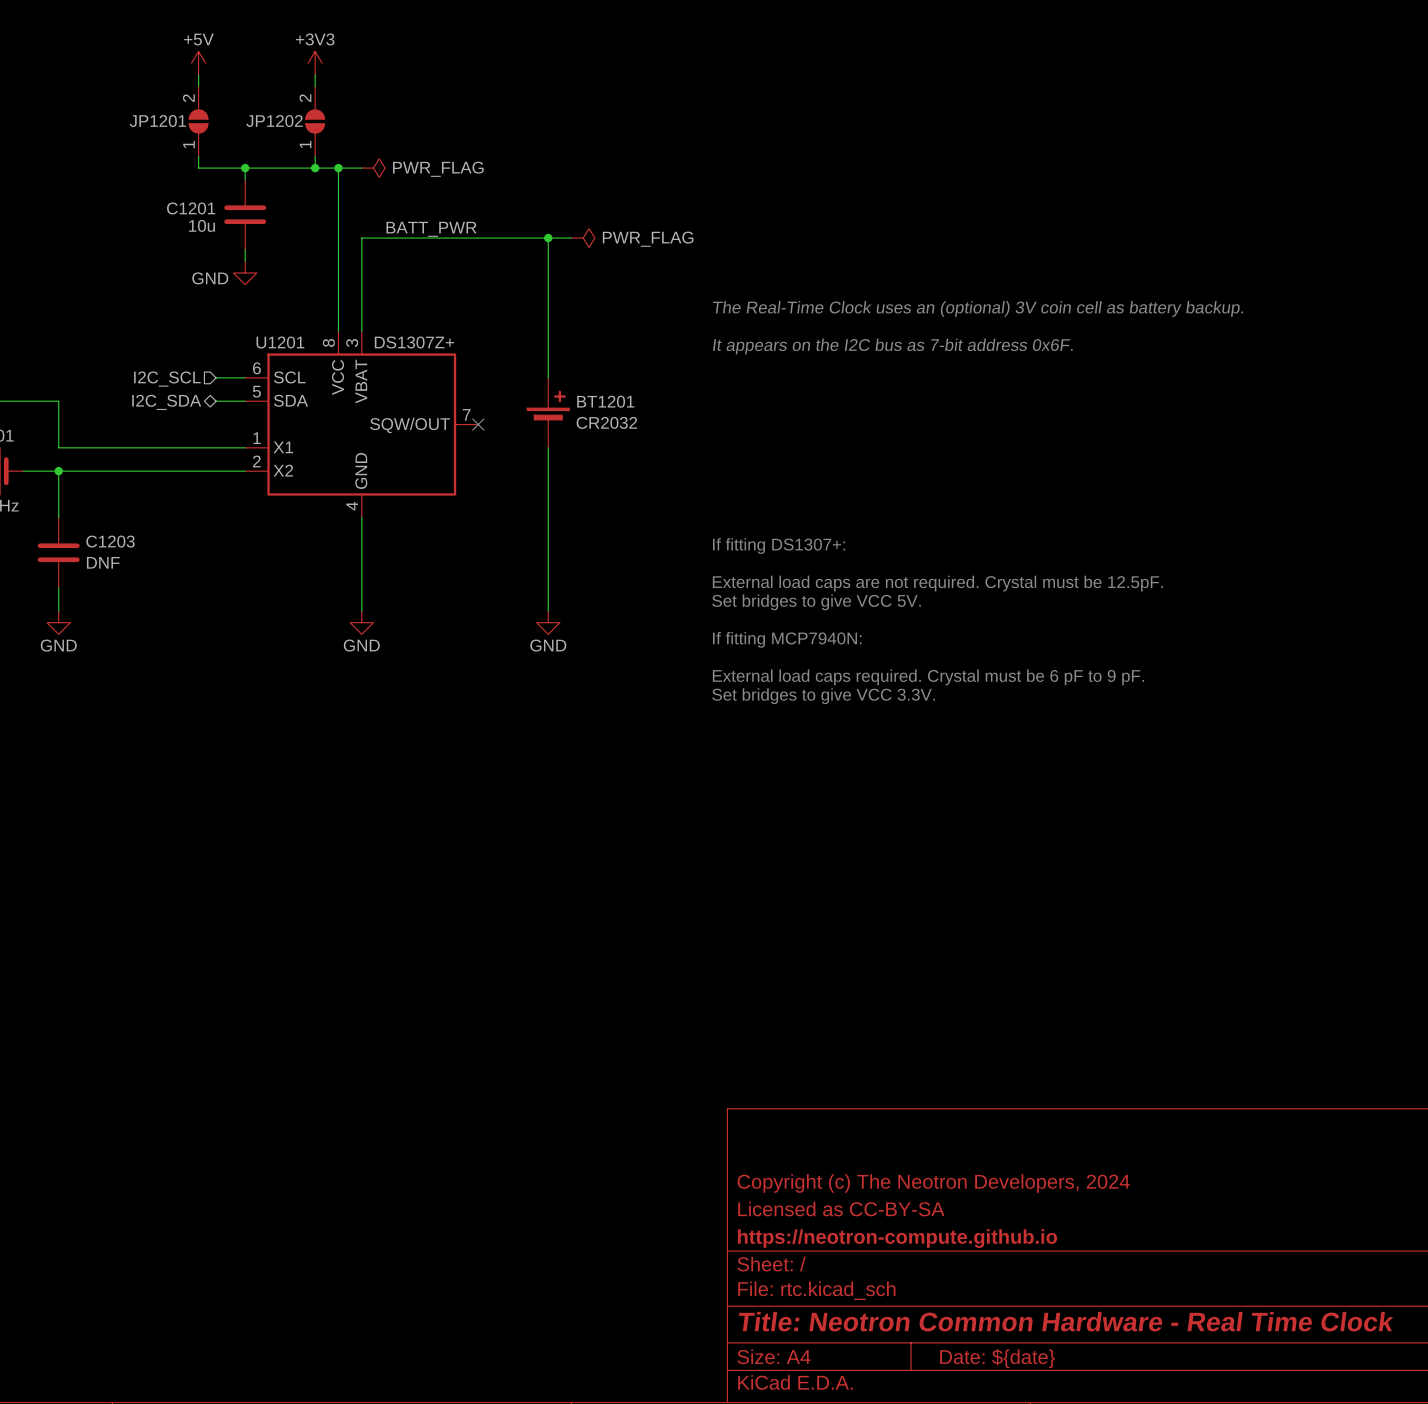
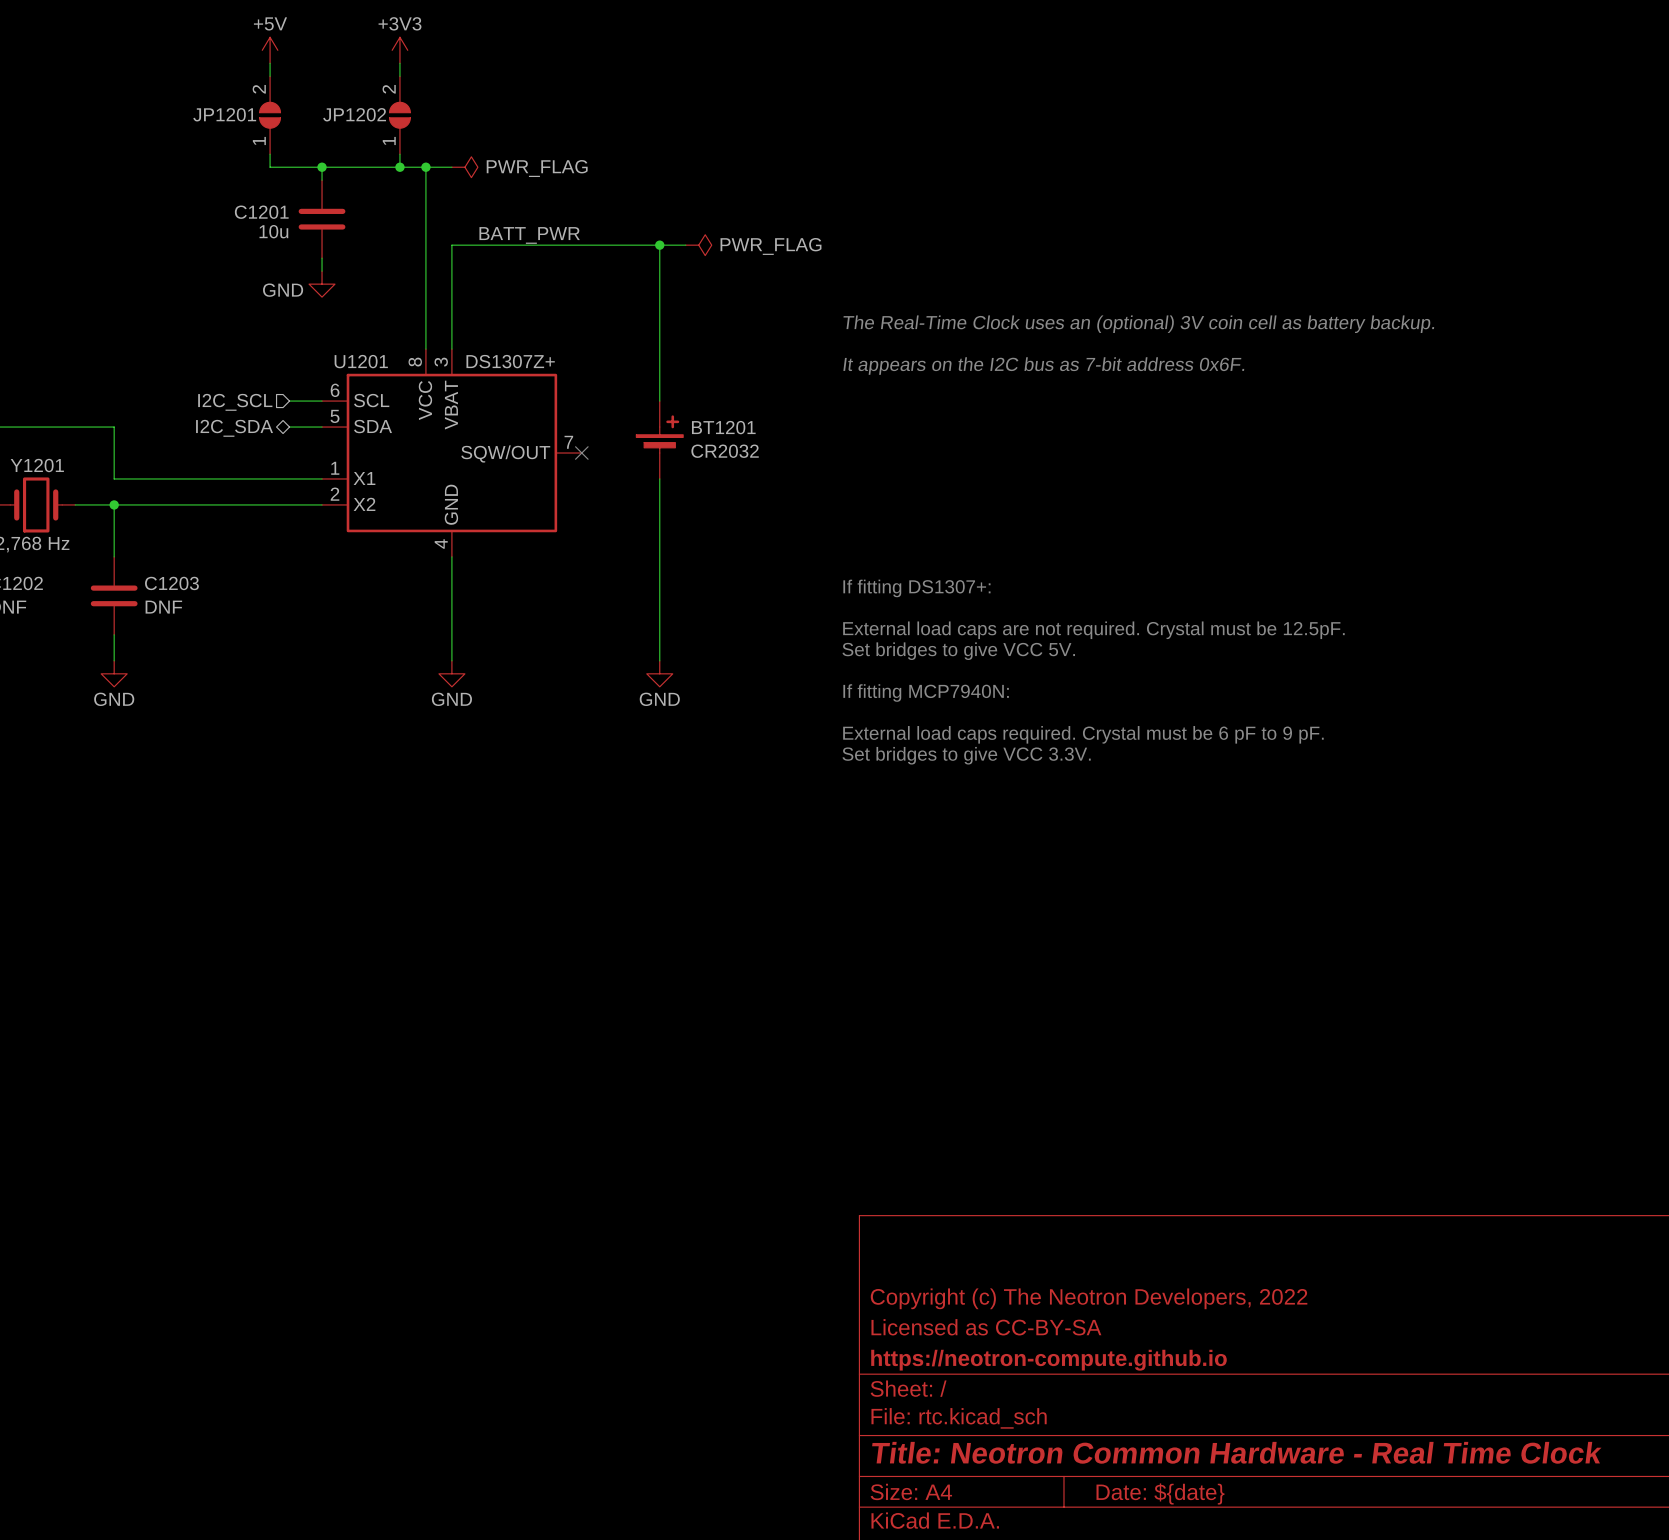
title block: Copyright (c) The Neotron Developers, 2024 (933, 1183) -> Copyright (c) The Neotron Developers, 2022 (1089, 1298)

